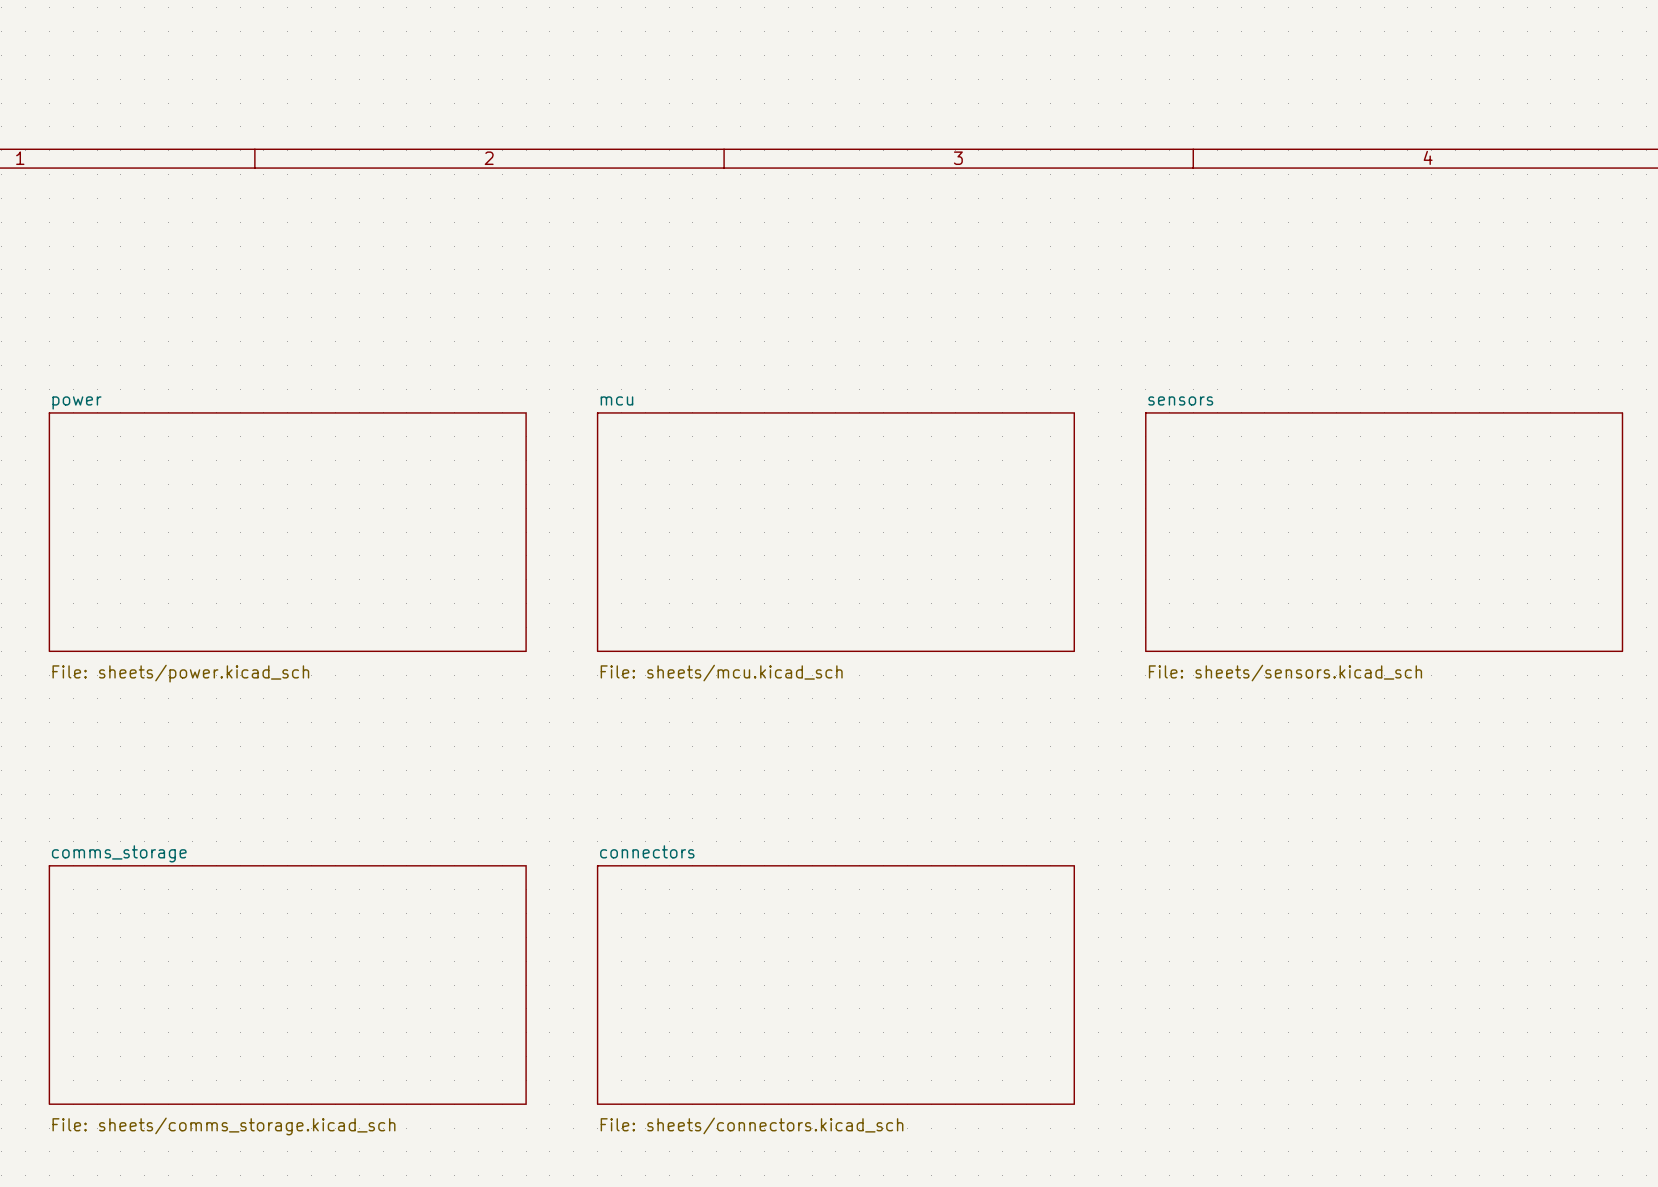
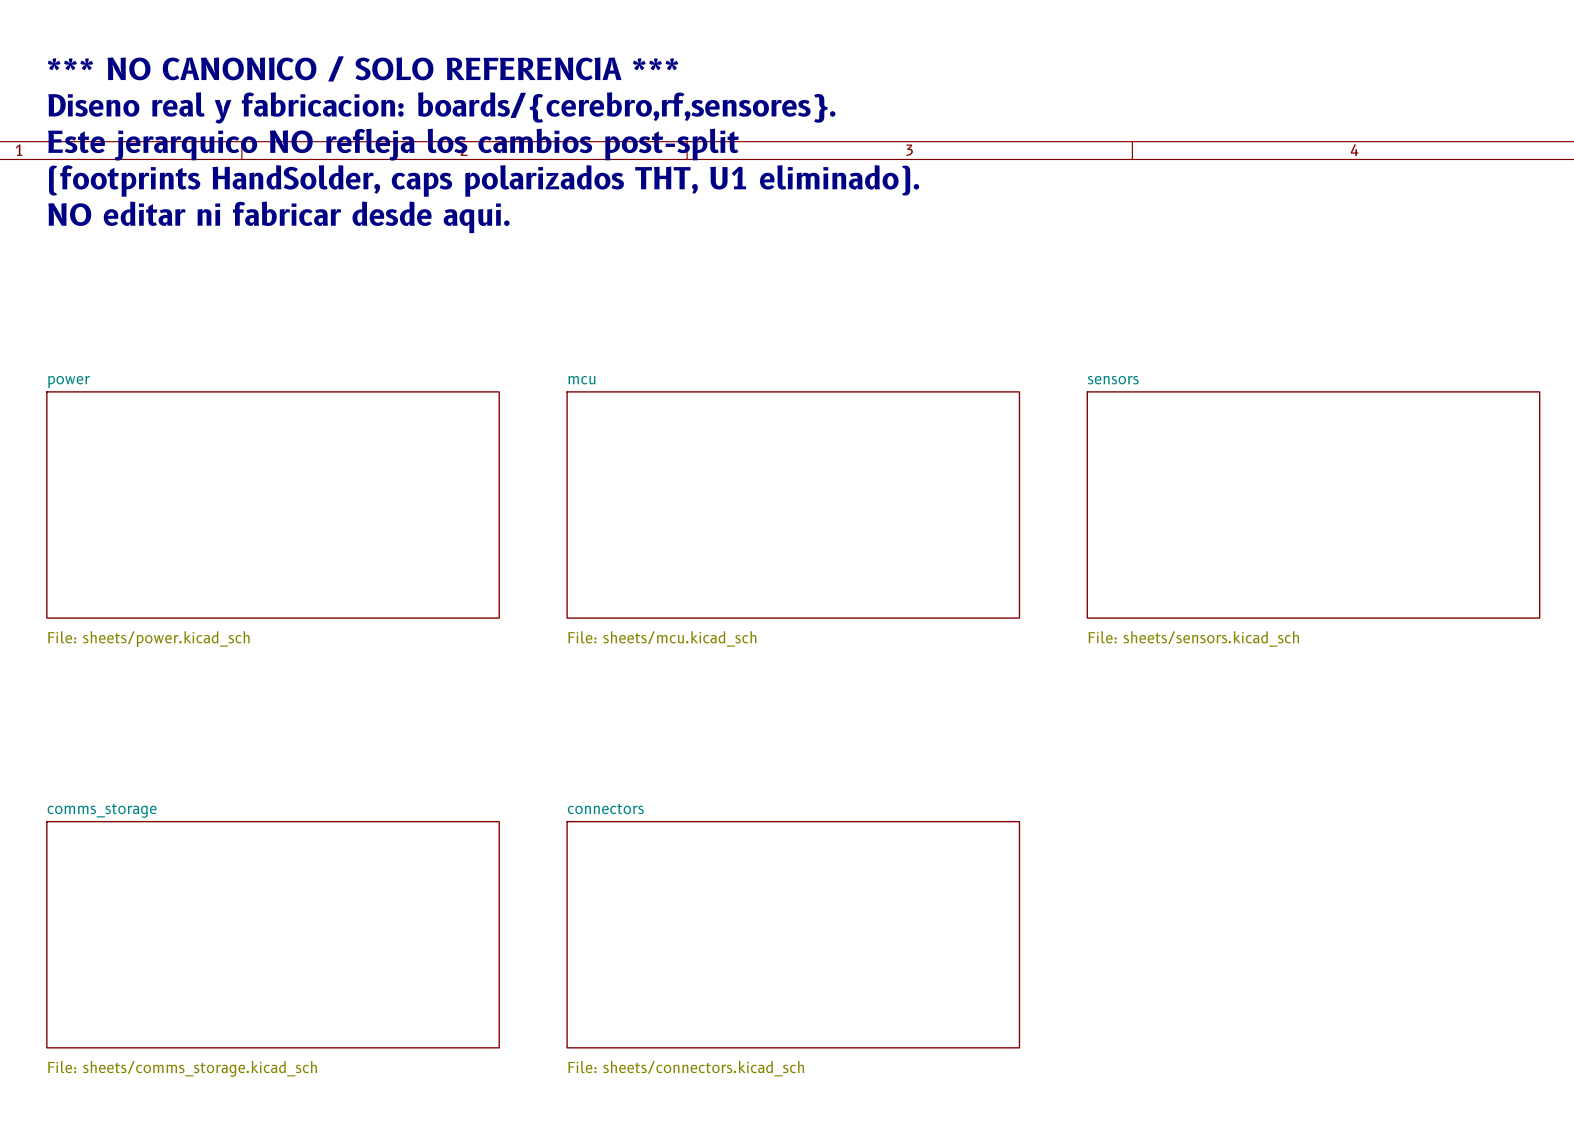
text: none -> *** NO CANONICO / SOLO REFERENCIA *** (363, 68)
text: none -> Diseno real y fabricacion: boards/{cerebro,rf,sensores}. (441, 107)
text: none -> Este jerarquico NO refleja los cambios post-split (393, 144)
text: none -> (footprints HandSolder, caps polarizados THT, U1 eliminado). (484, 180)
text: none -> NO editar ni fabricar desde aqui. (278, 217)

